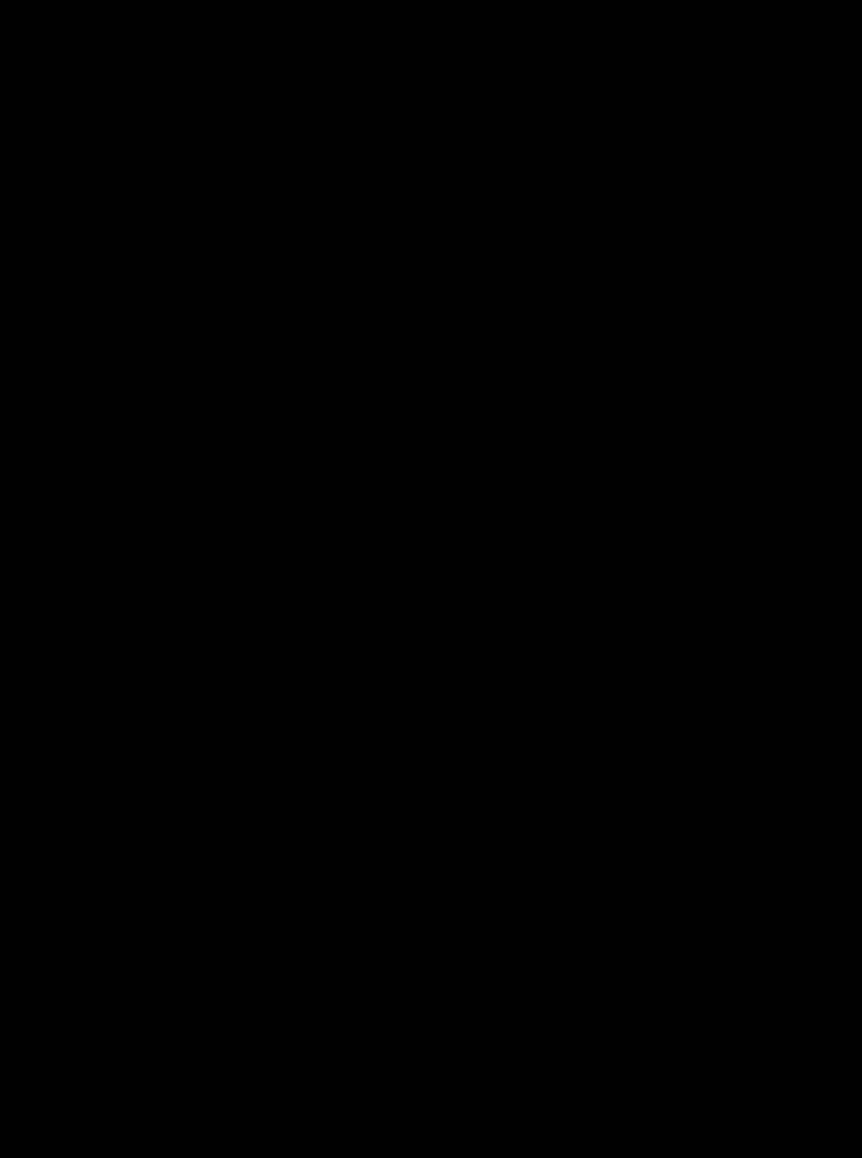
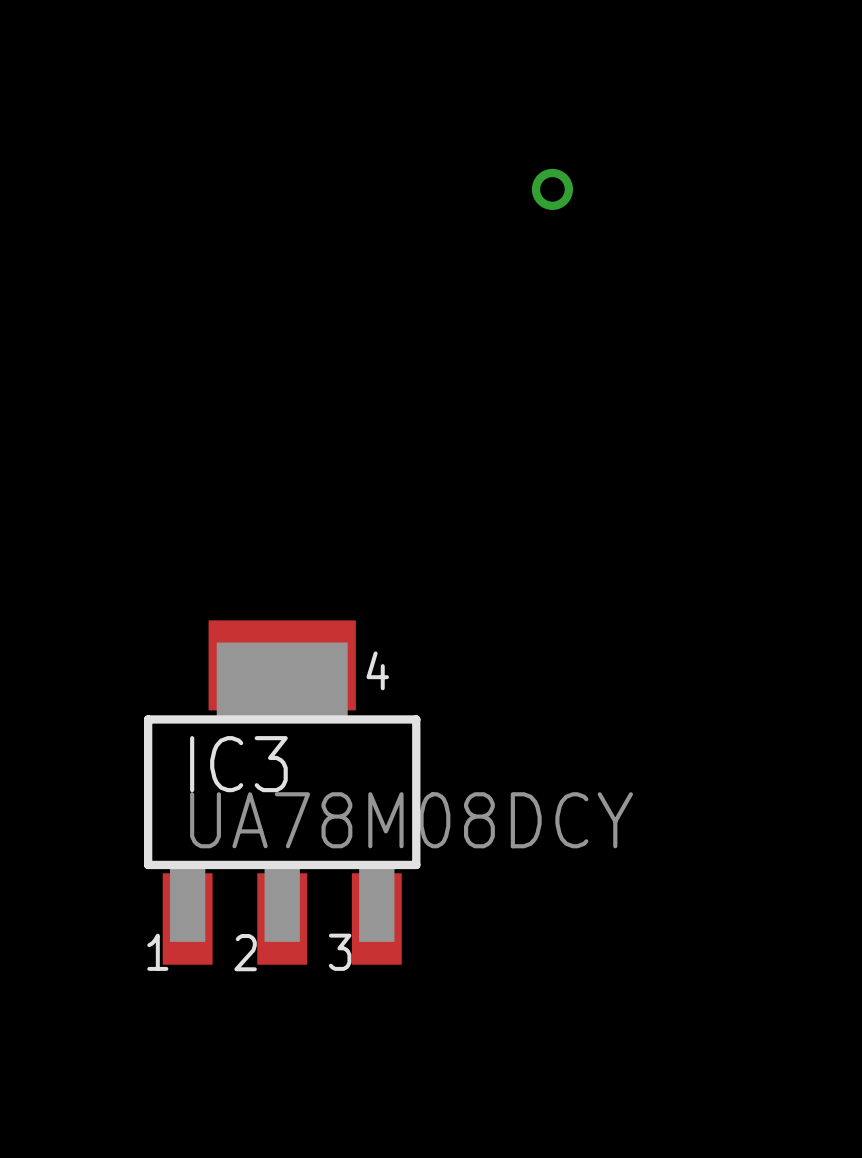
via: none -> (552, 189)
IC3: none -> UA78M08DCY (282, 792)

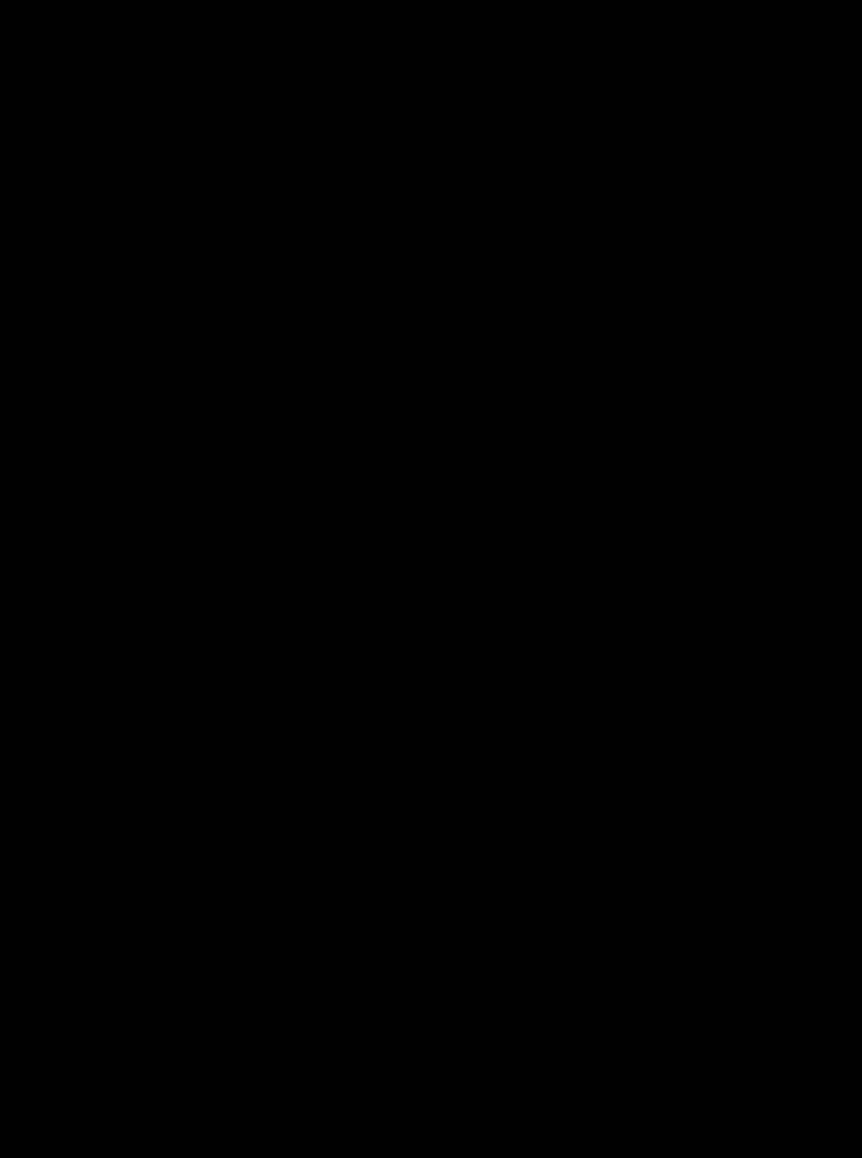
via: (552, 189) -> none
IC3: UA78M08DCY (282, 792) -> none

